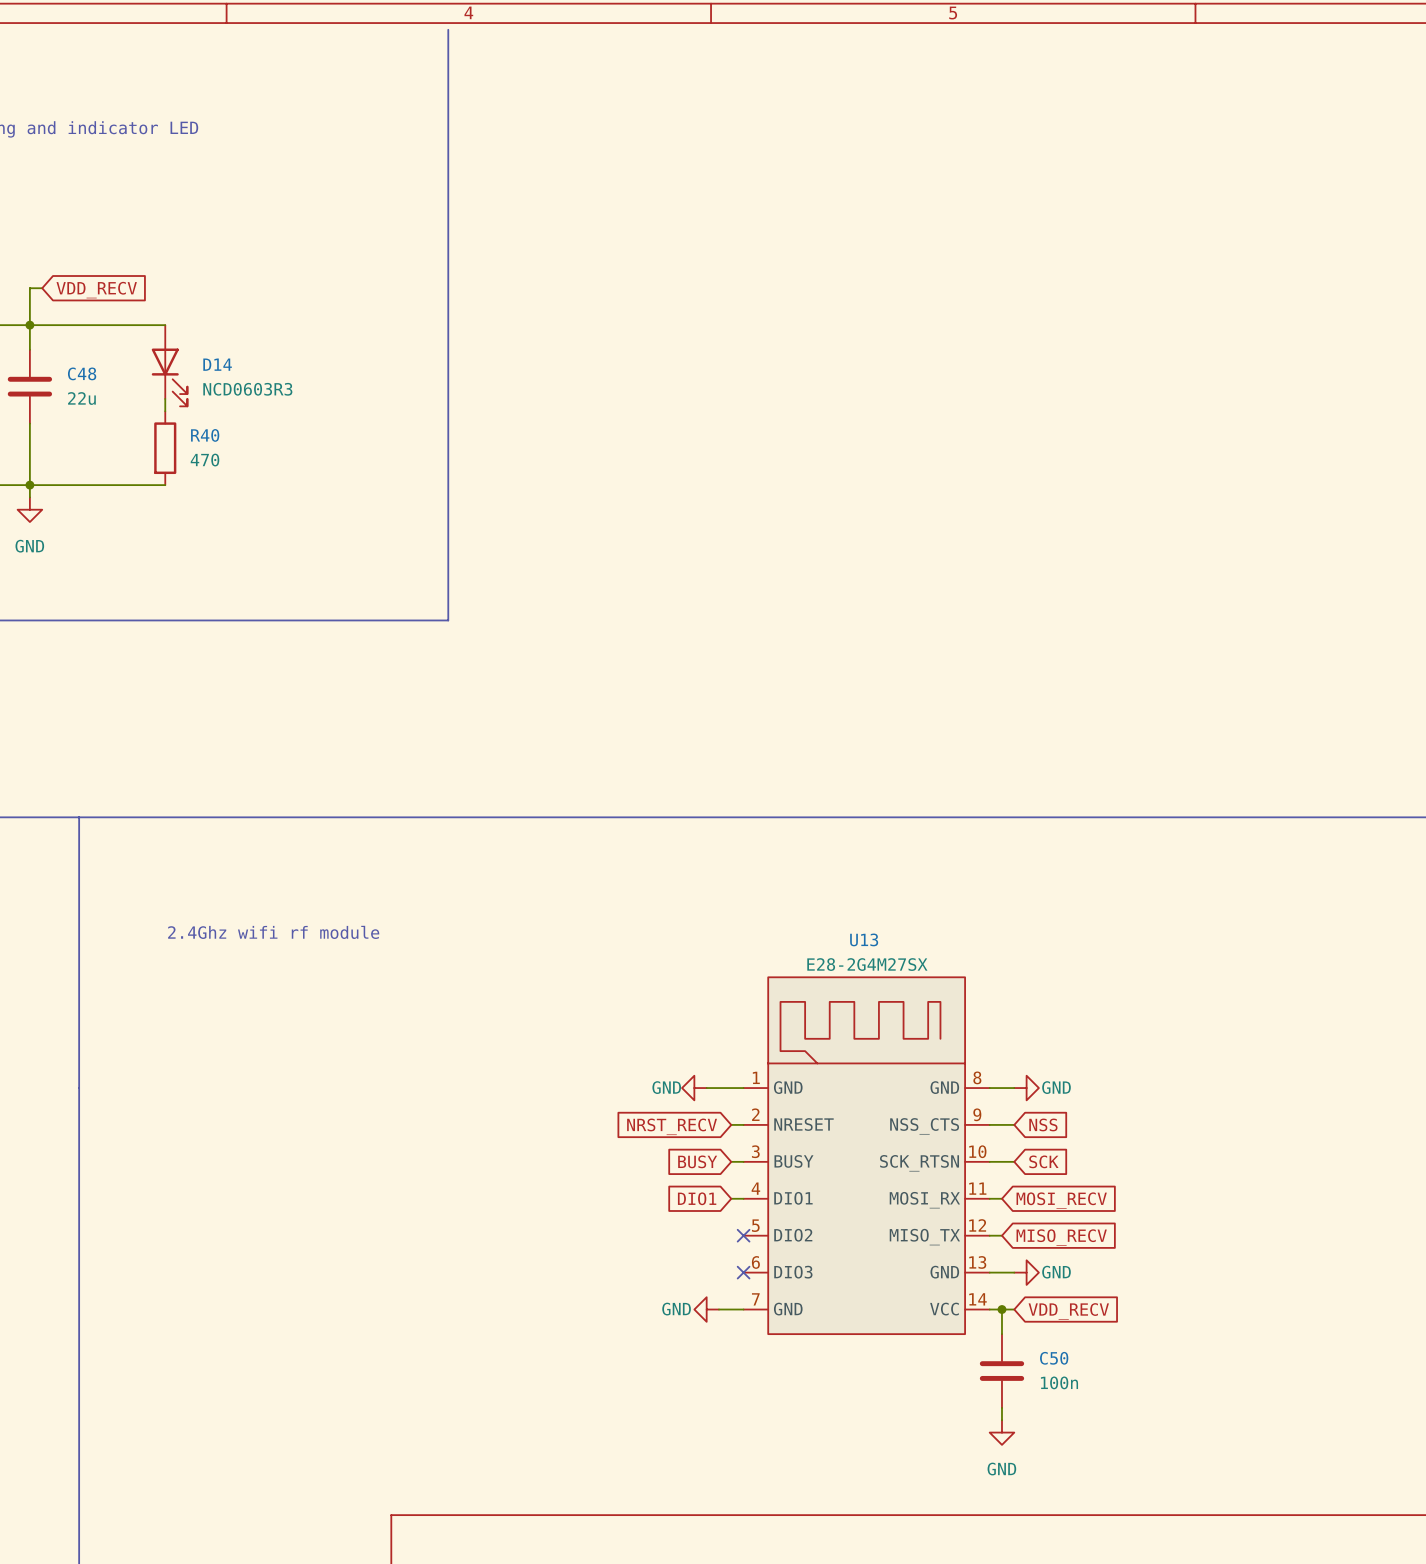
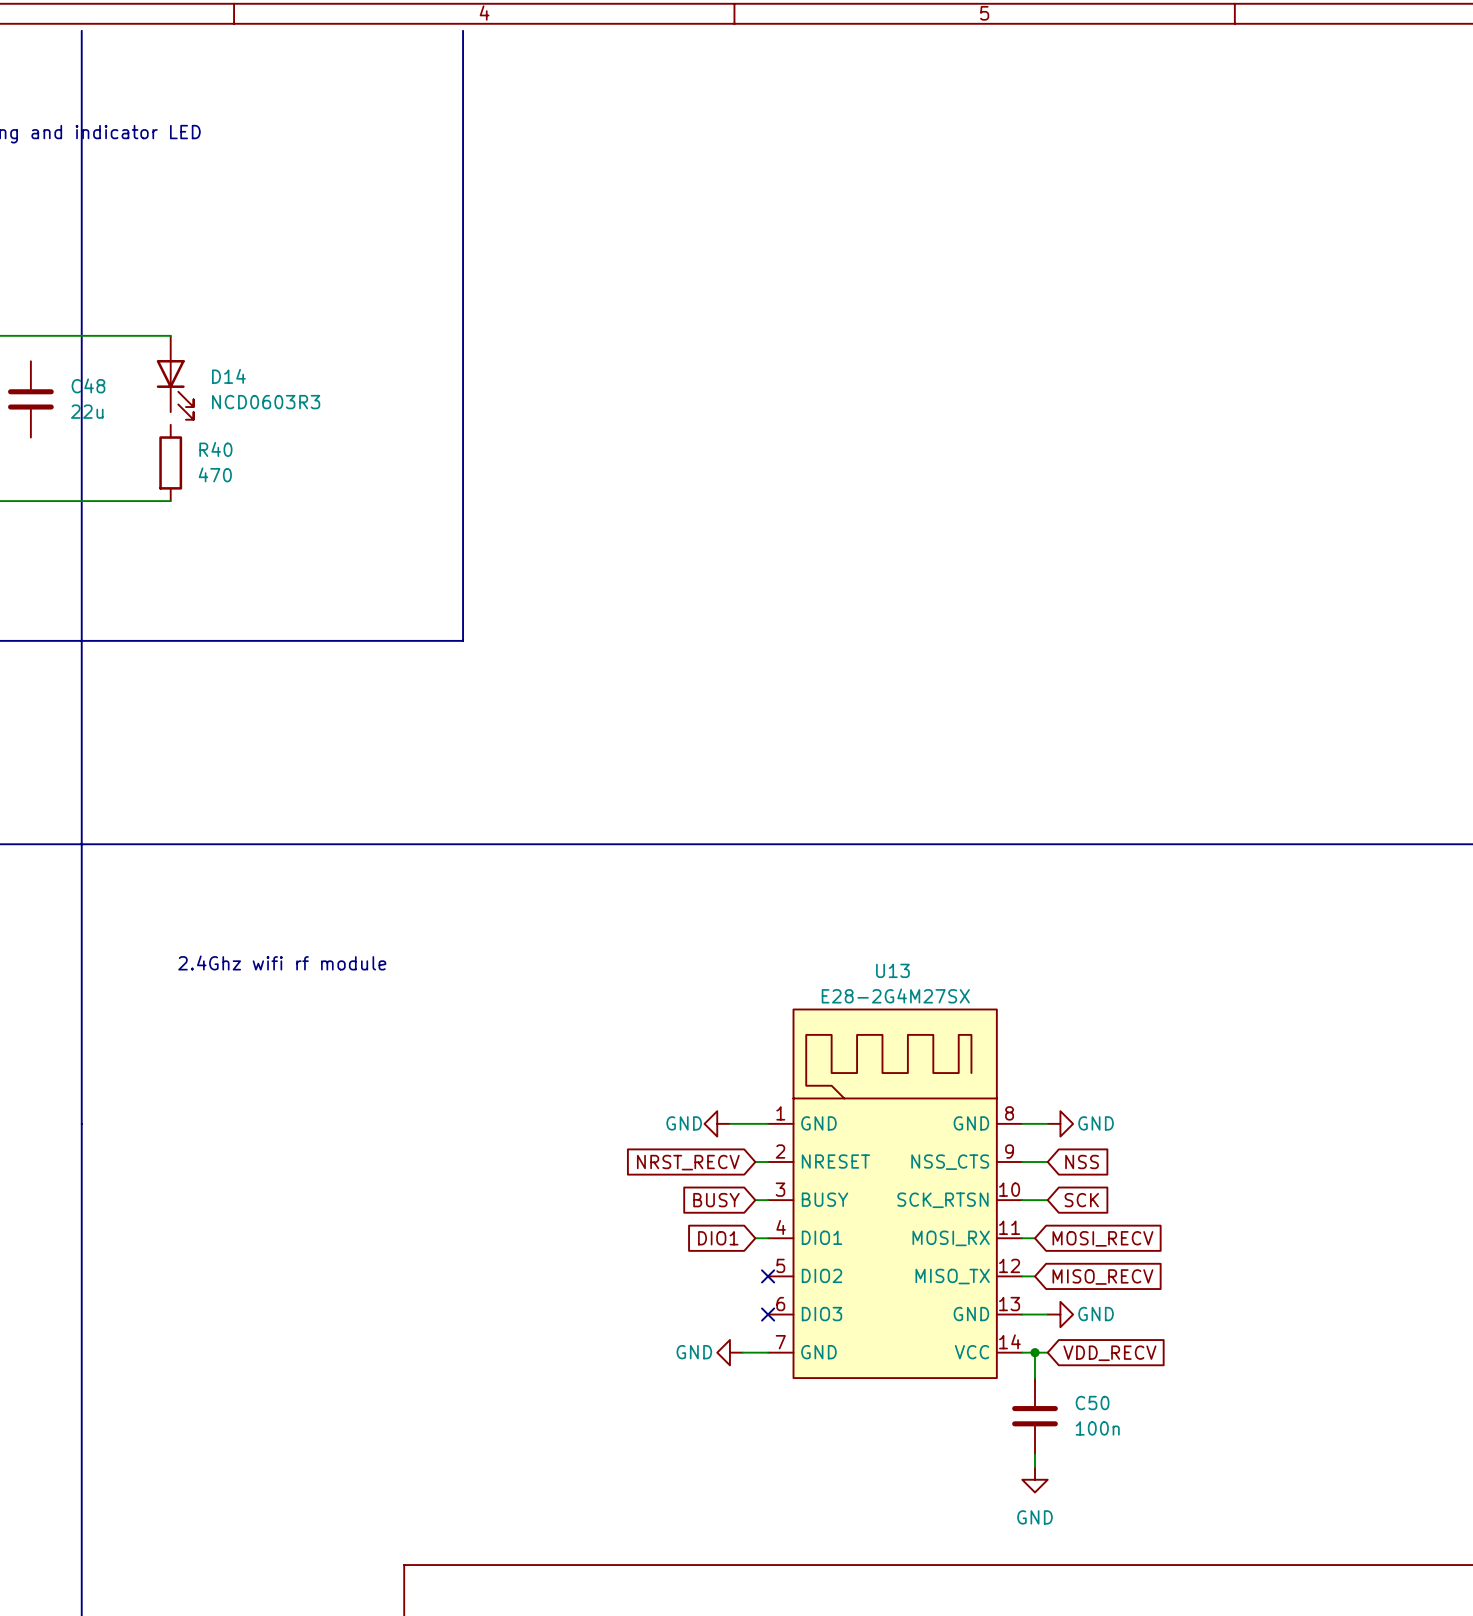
line: none -> (81, 30) (81, 844)
wire: (42, 288) (29, 288) (29, 349) -> none
global label: VDD_RECV (96, 290) -> none
junction: (29, 325) -> none
wire: (165, 398) (165, 411) -> none
wire: (29, 423) (29, 497) -> none
junction: (29, 485) -> none
power symbol: GND (29, 509) -> none

